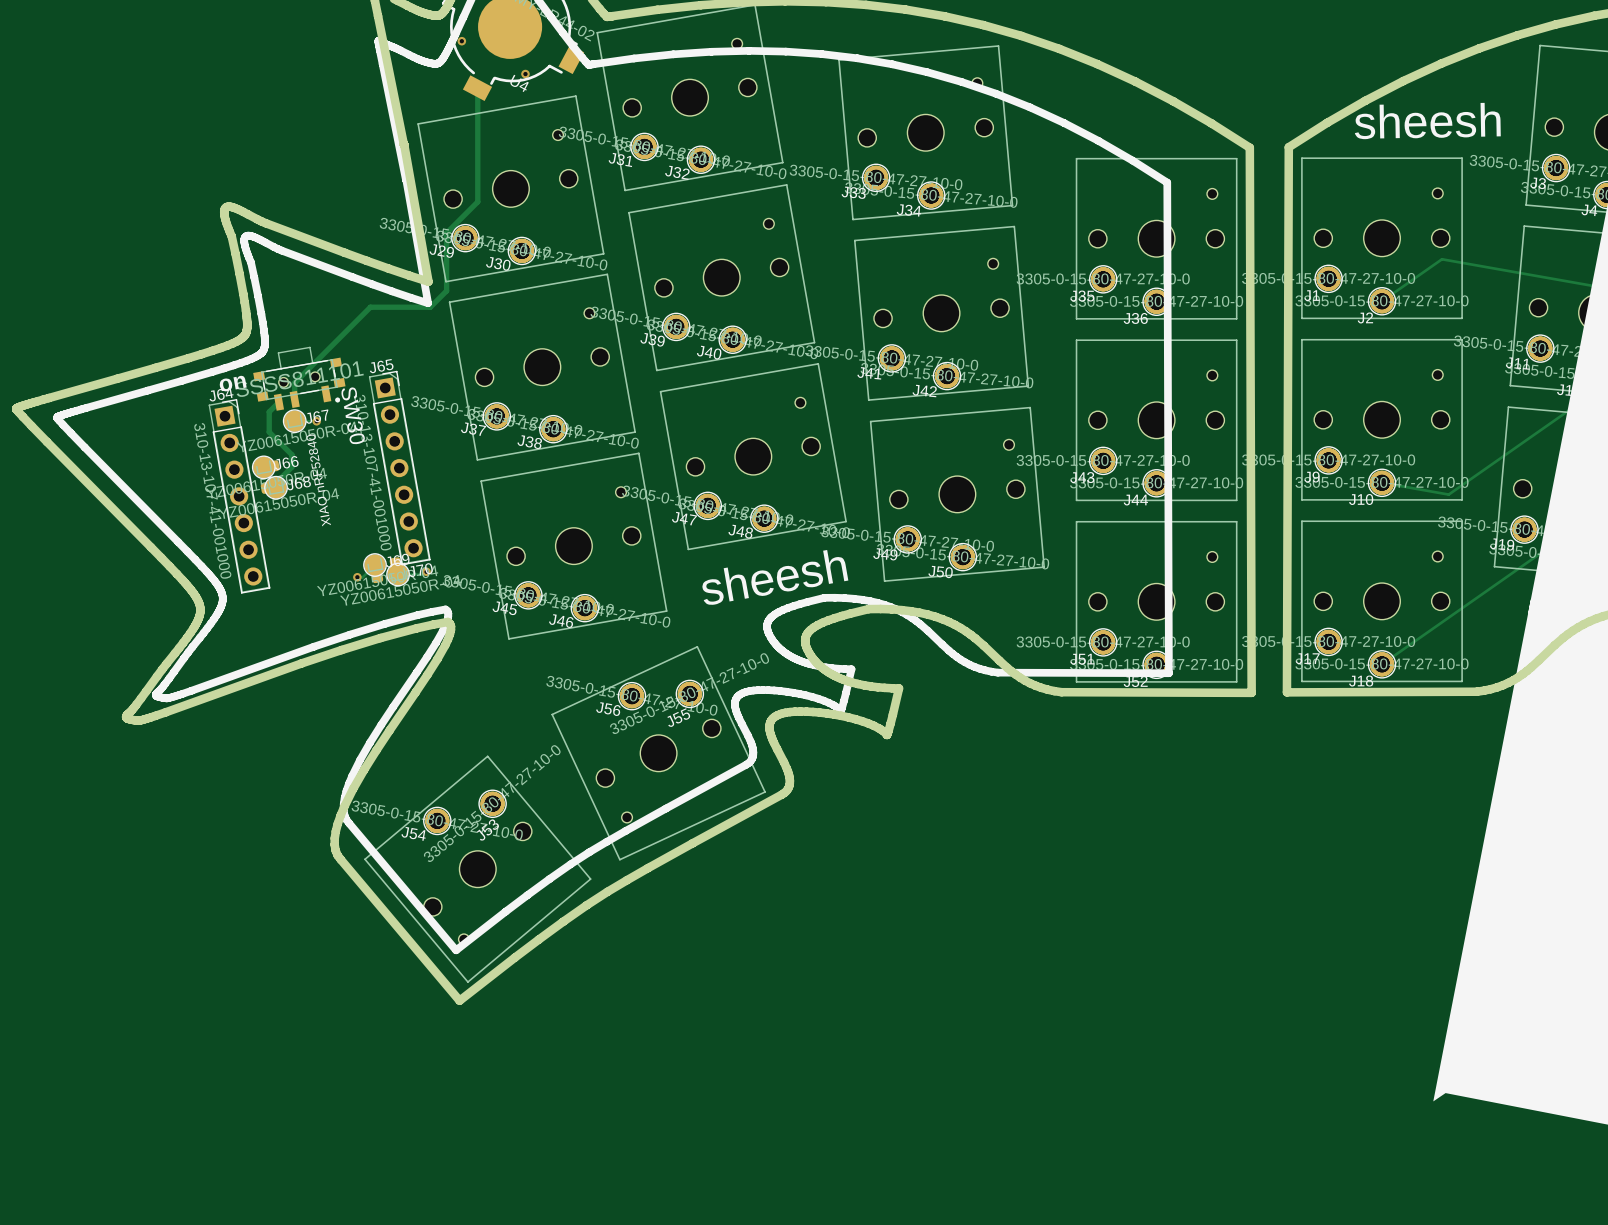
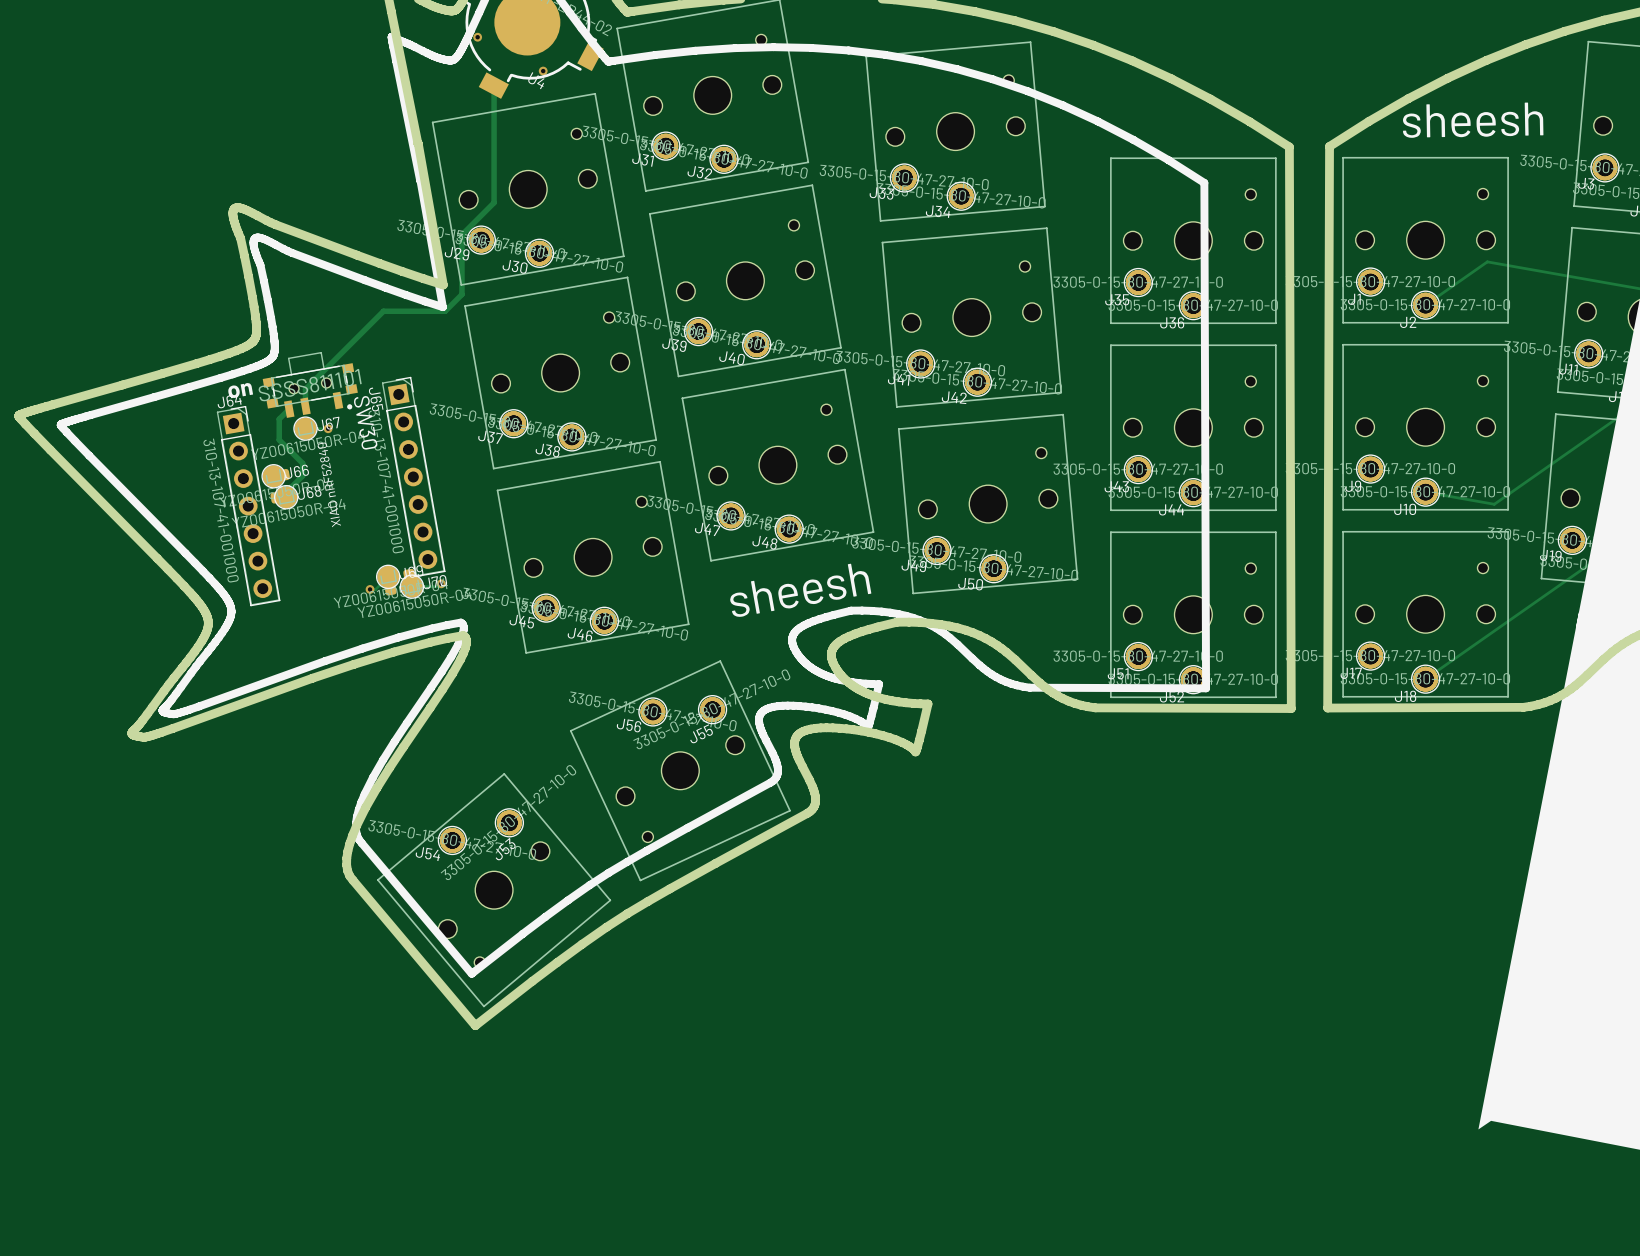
J65 name rotation: 0° (381, 366) -> 90° clockwise (376, 399)

